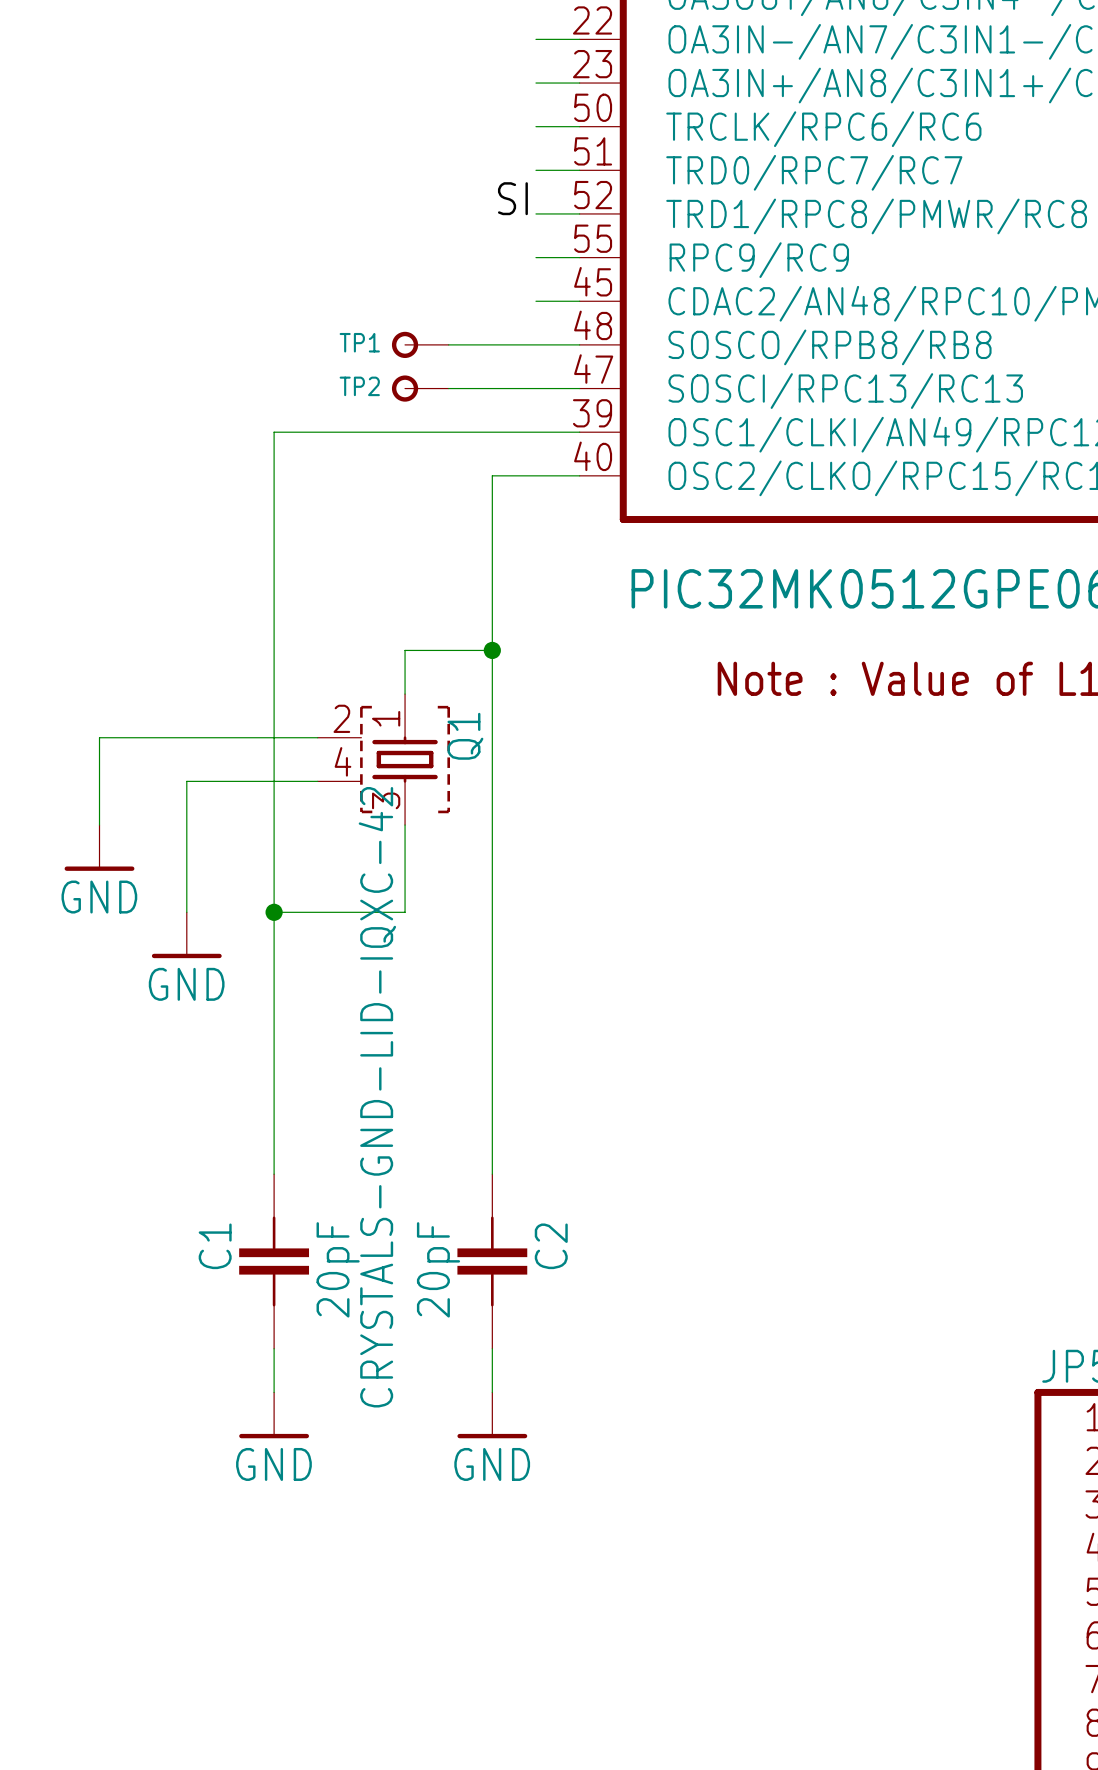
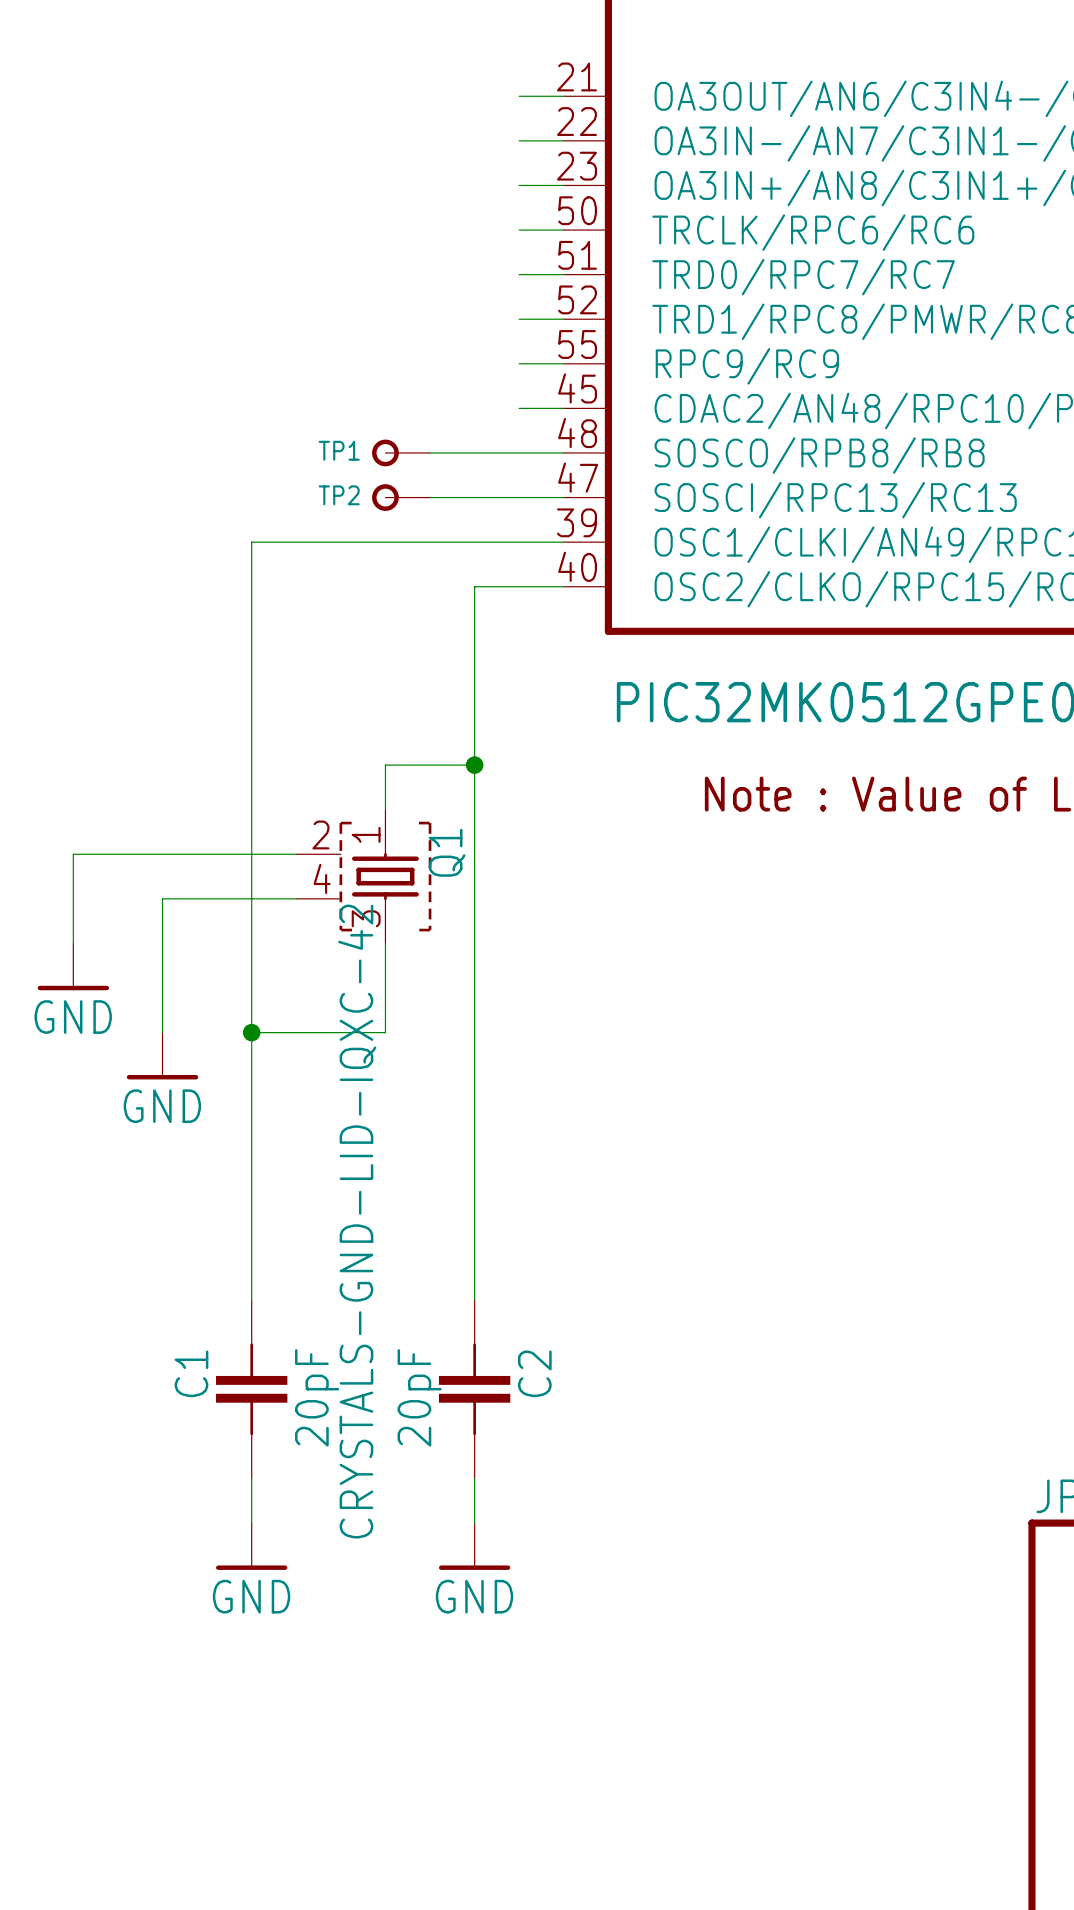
label: SI (512, 198) -> none

